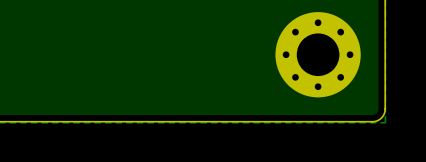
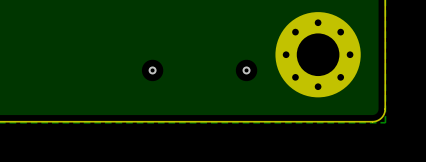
via: none -> (152, 70)
via: none -> (246, 70)

